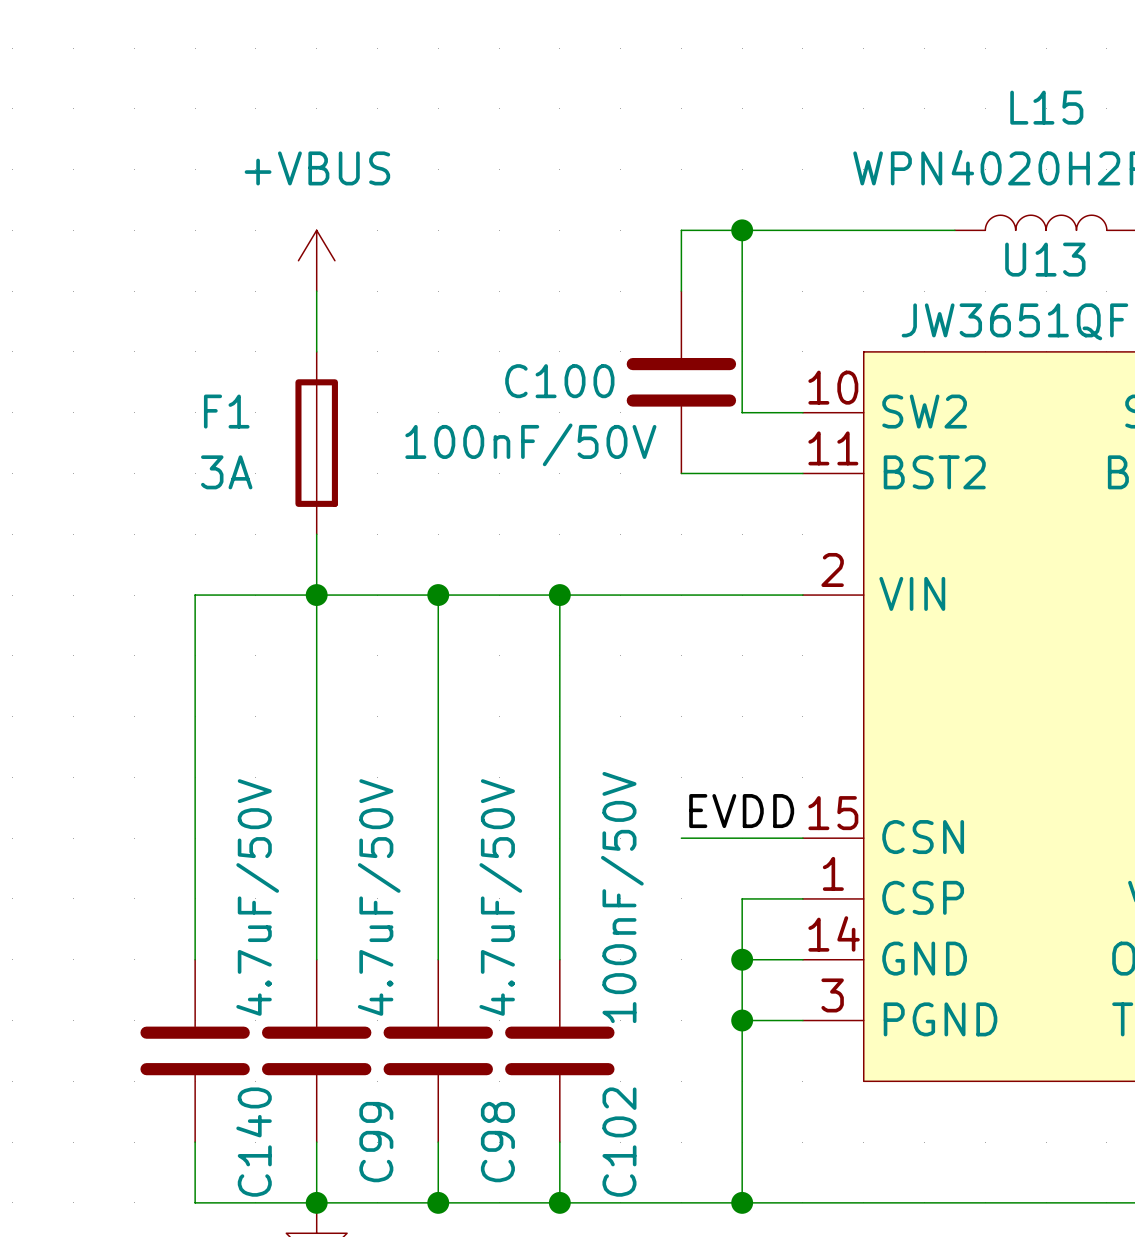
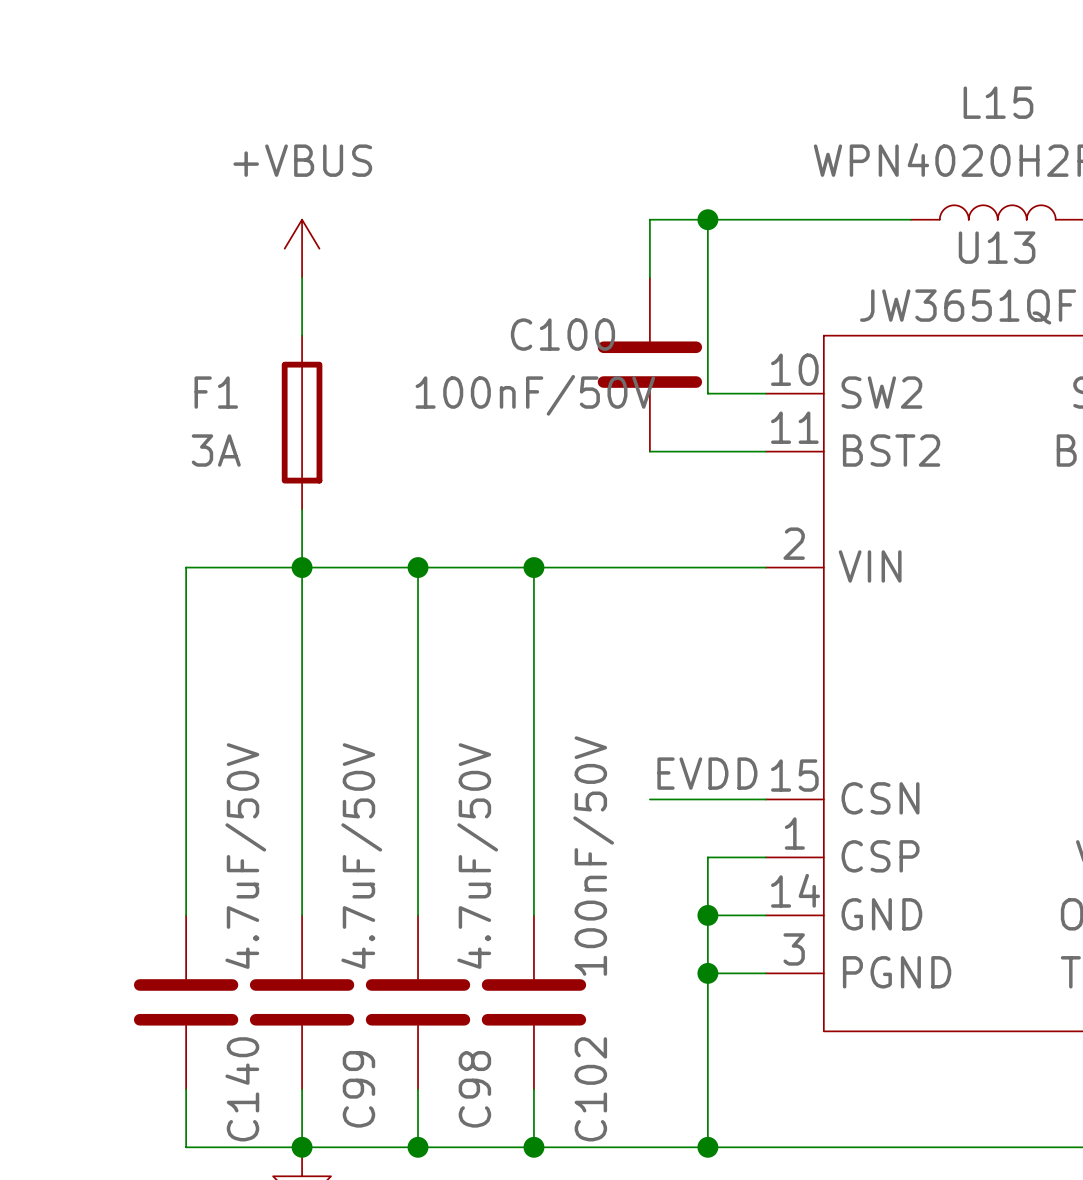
C100 name position: C100 (559, 381) -> C100 (562, 334)
C100 value position: 100nF/50V (530, 444) -> 100nF/50V (535, 395)

